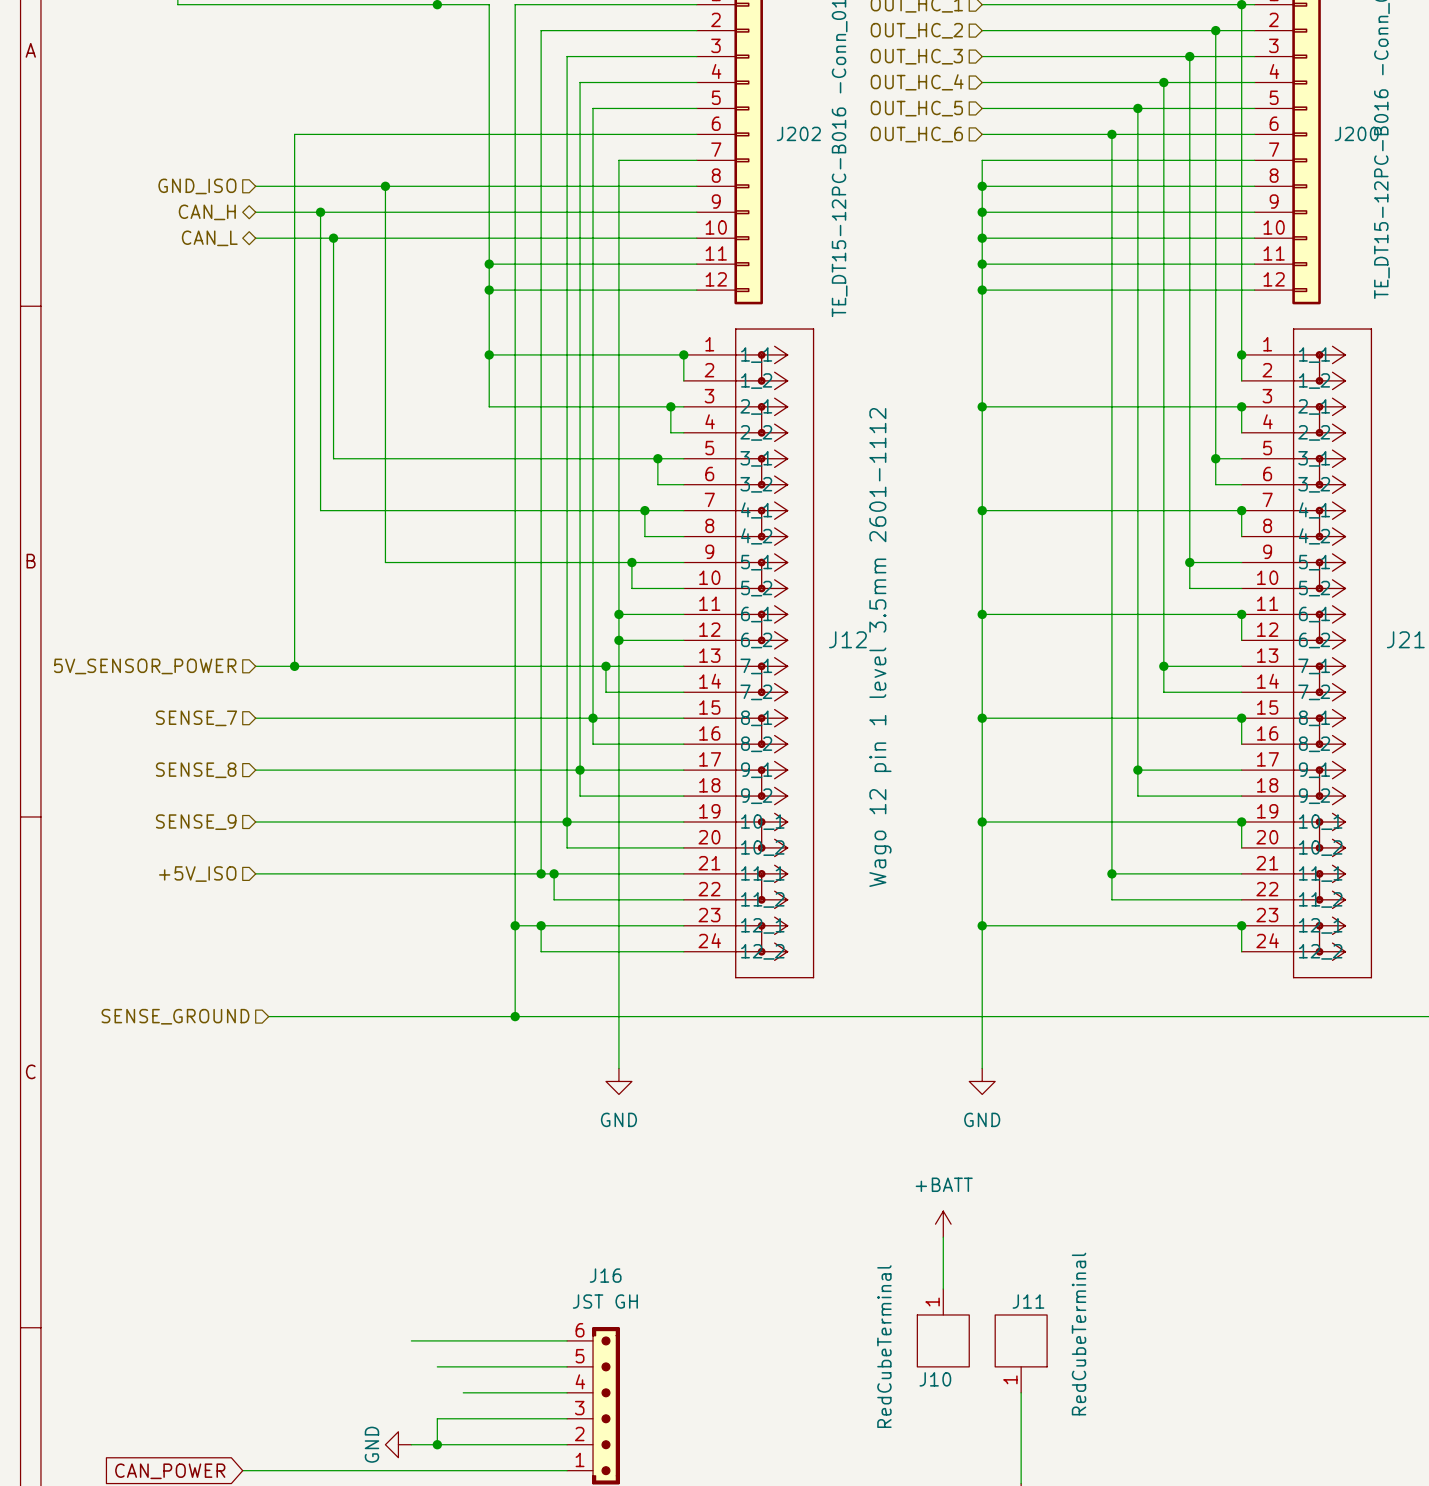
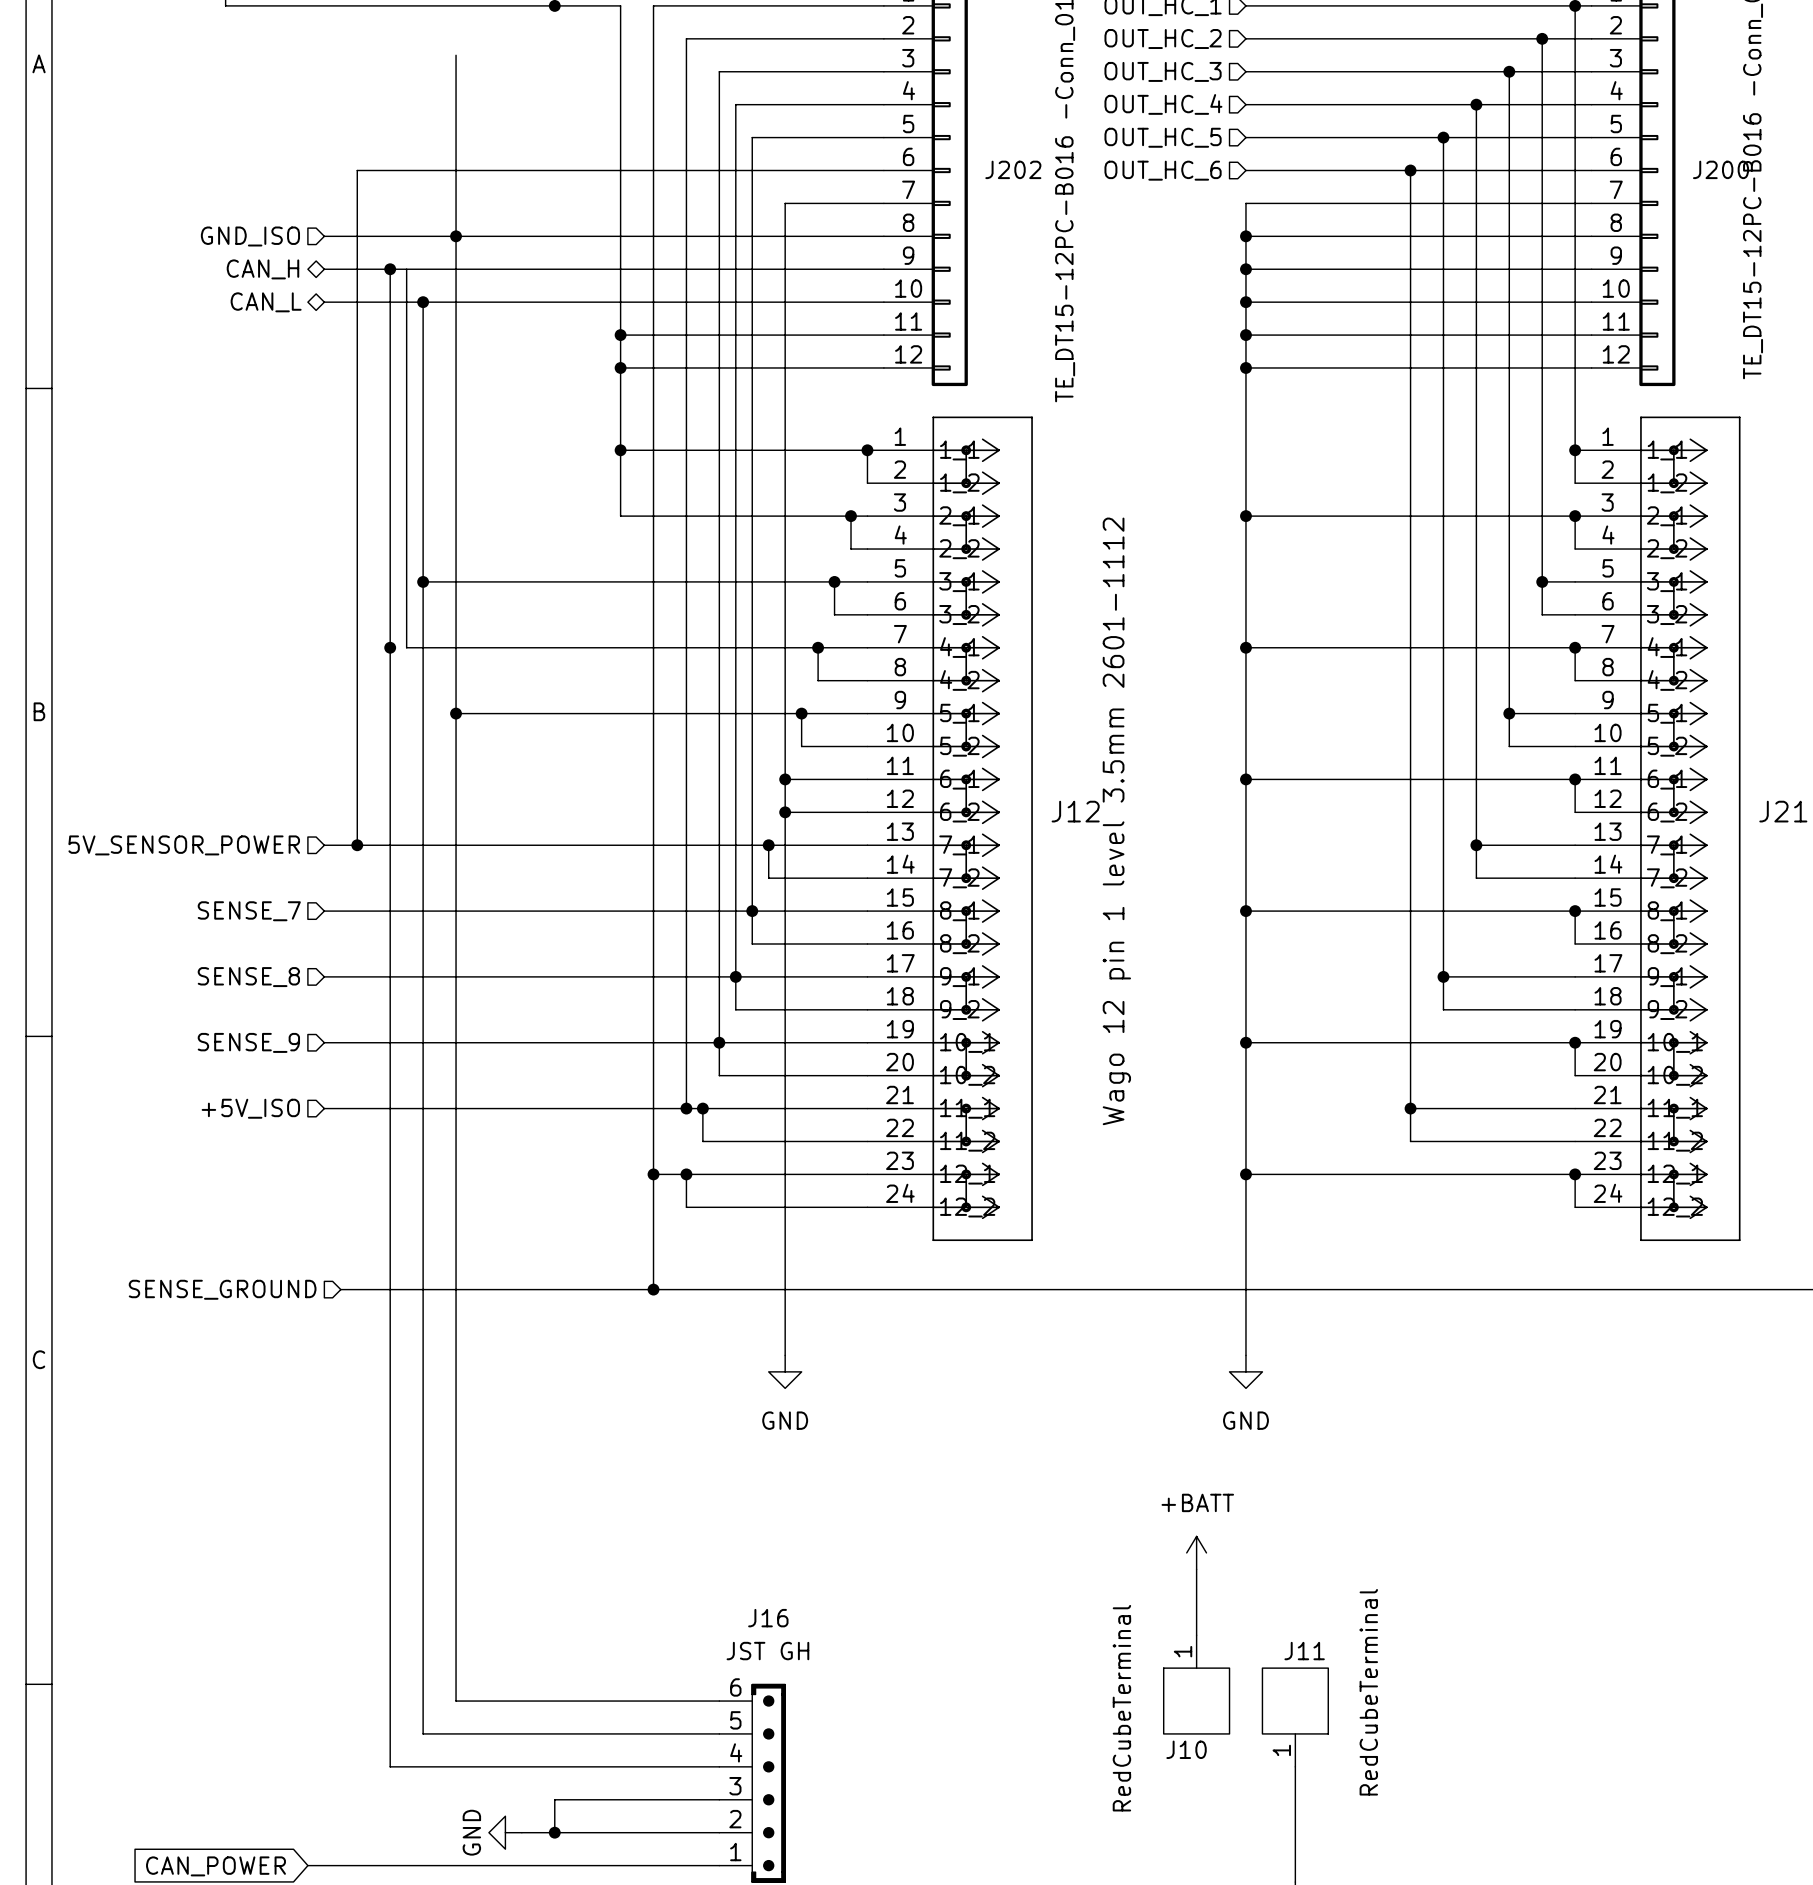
wire: none -> (456, 55) (456, 1701) (521, 1701)
wire: (294, 134) (294, 666) -> (373, 170) (357, 170) (357, 845)
junction: none -> (456, 236)
wire: (385, 186) (385, 562) -> (456, 713) (488, 713)
junction: (385, 186) -> none
wire: none -> (390, 269) (390, 1766) (587, 1766)
junction position: (320, 212) -> (390, 269)
wire: none -> (423, 581) (423, 1733) (554, 1733)
junction: none -> (423, 581)
junction: none -> (390, 647)
junction: none -> (456, 713)
junction position: (294, 666) -> (357, 845)

